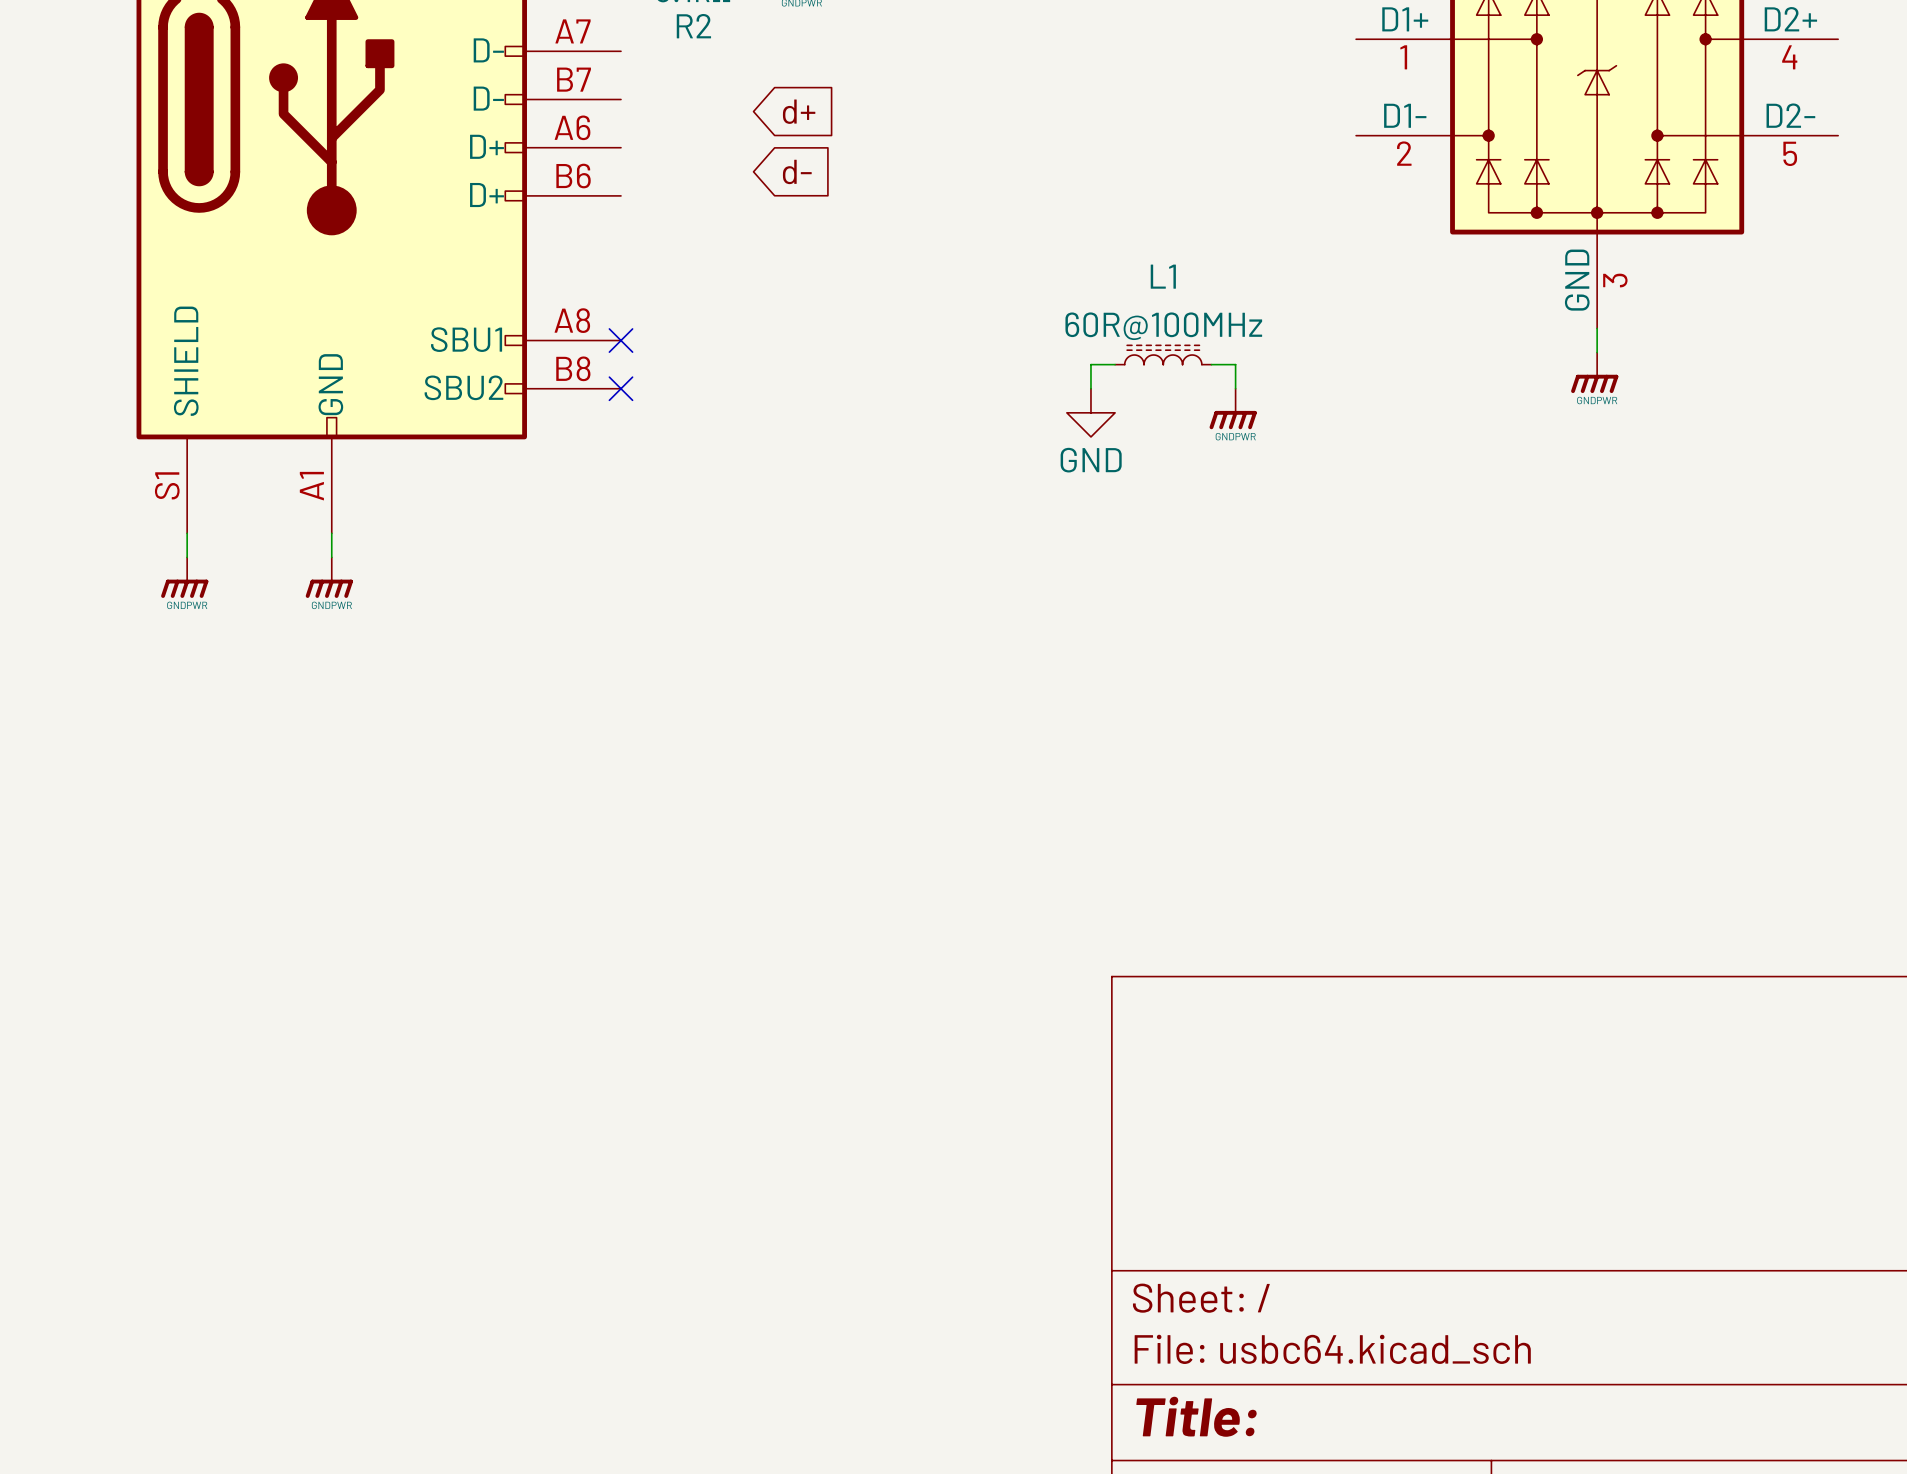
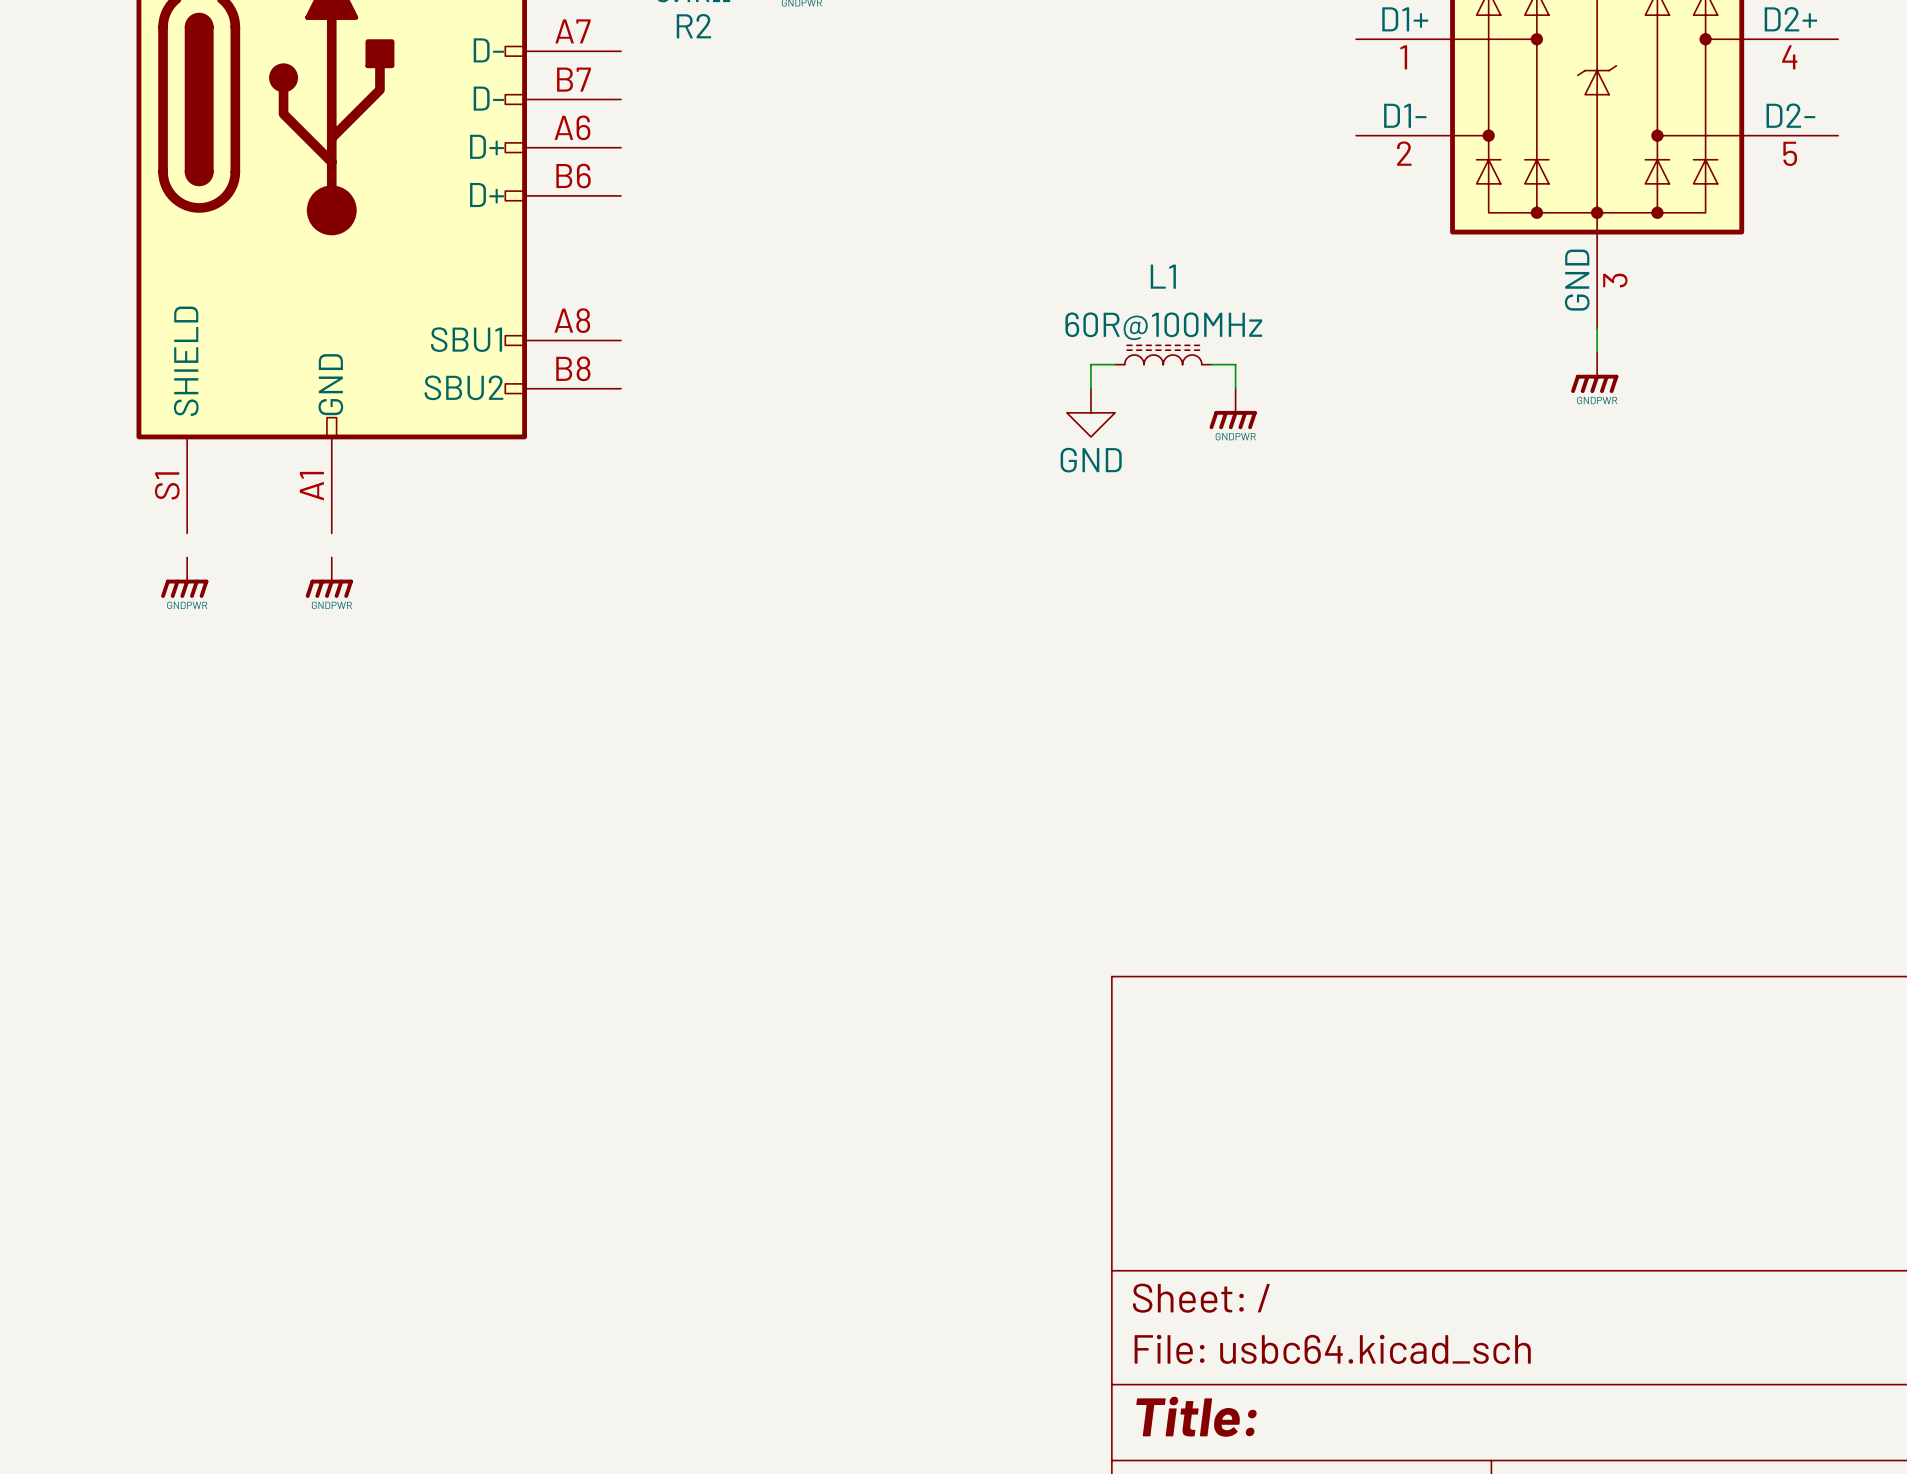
global label: d+ (799, 111) -> none
global label: d- (797, 171) -> none
no-connect mark: (620, 340) -> none
no-connect mark: (620, 388) -> none
wire: (187, 533) (187, 557) -> none
wire: (331, 533) (331, 557) -> none

